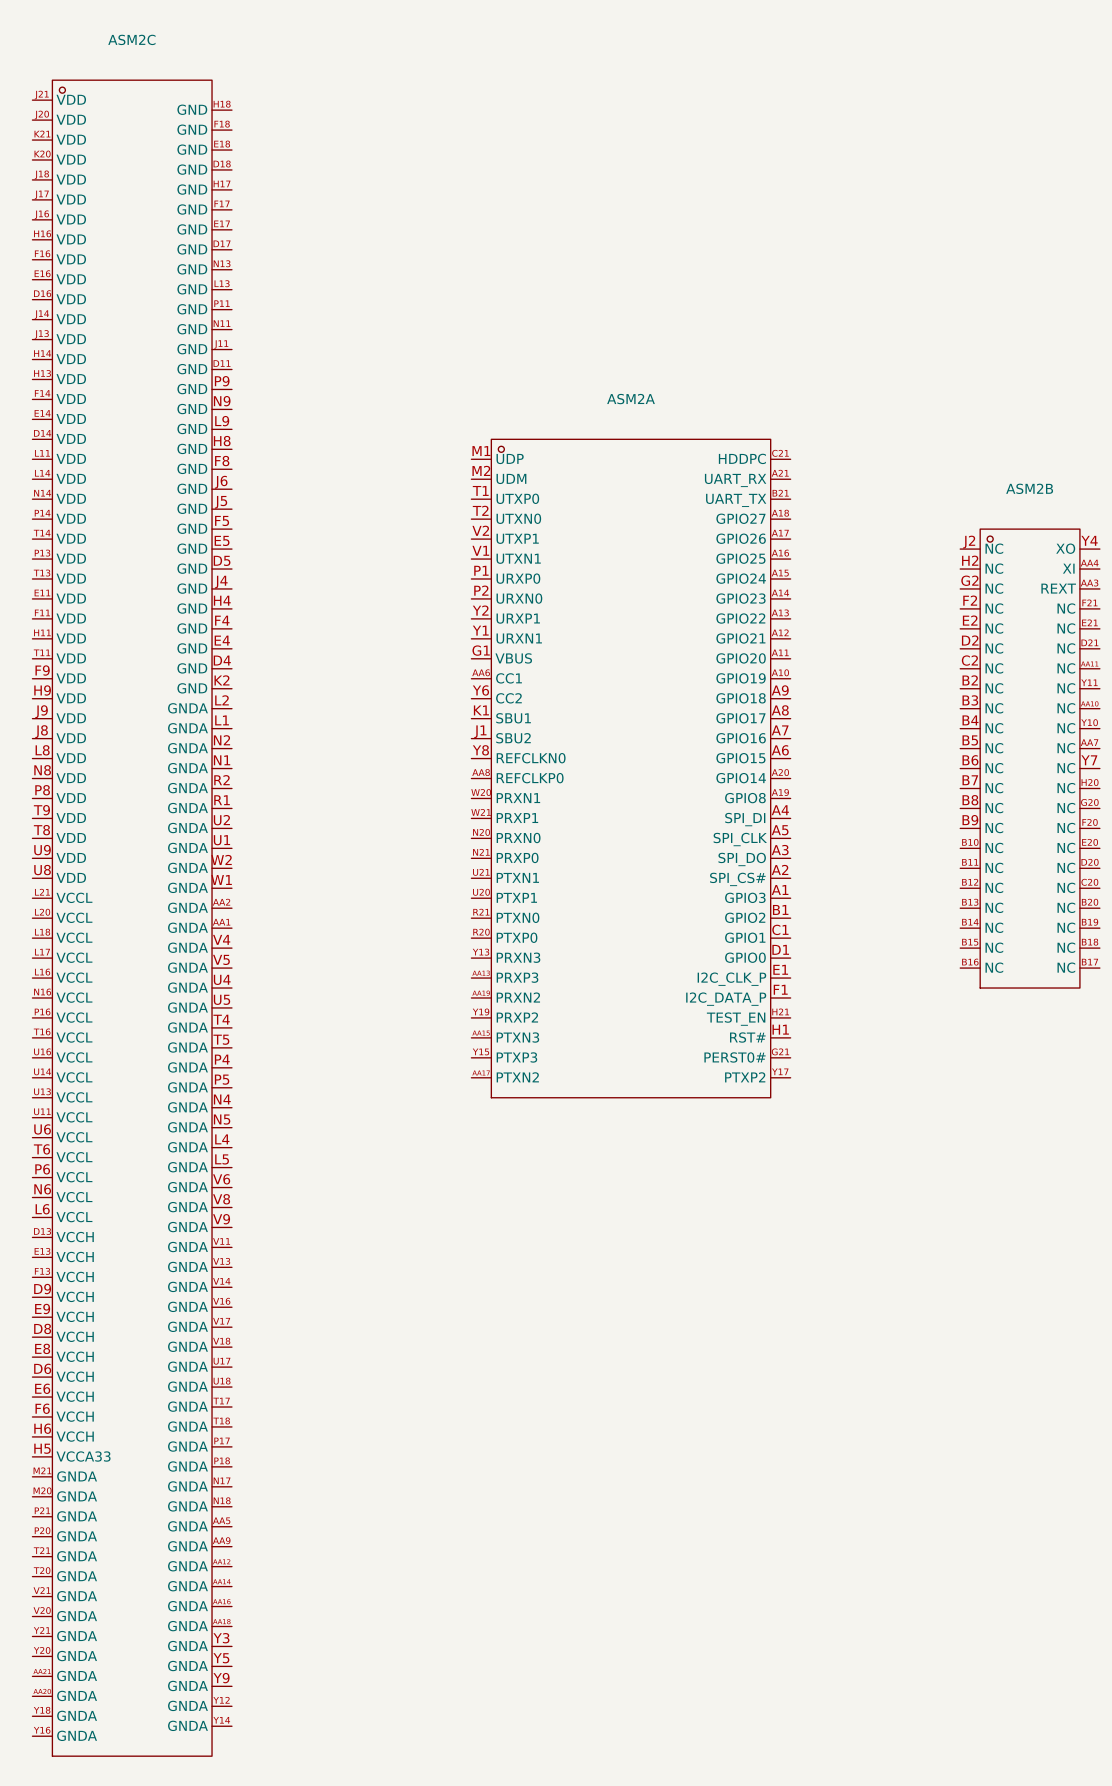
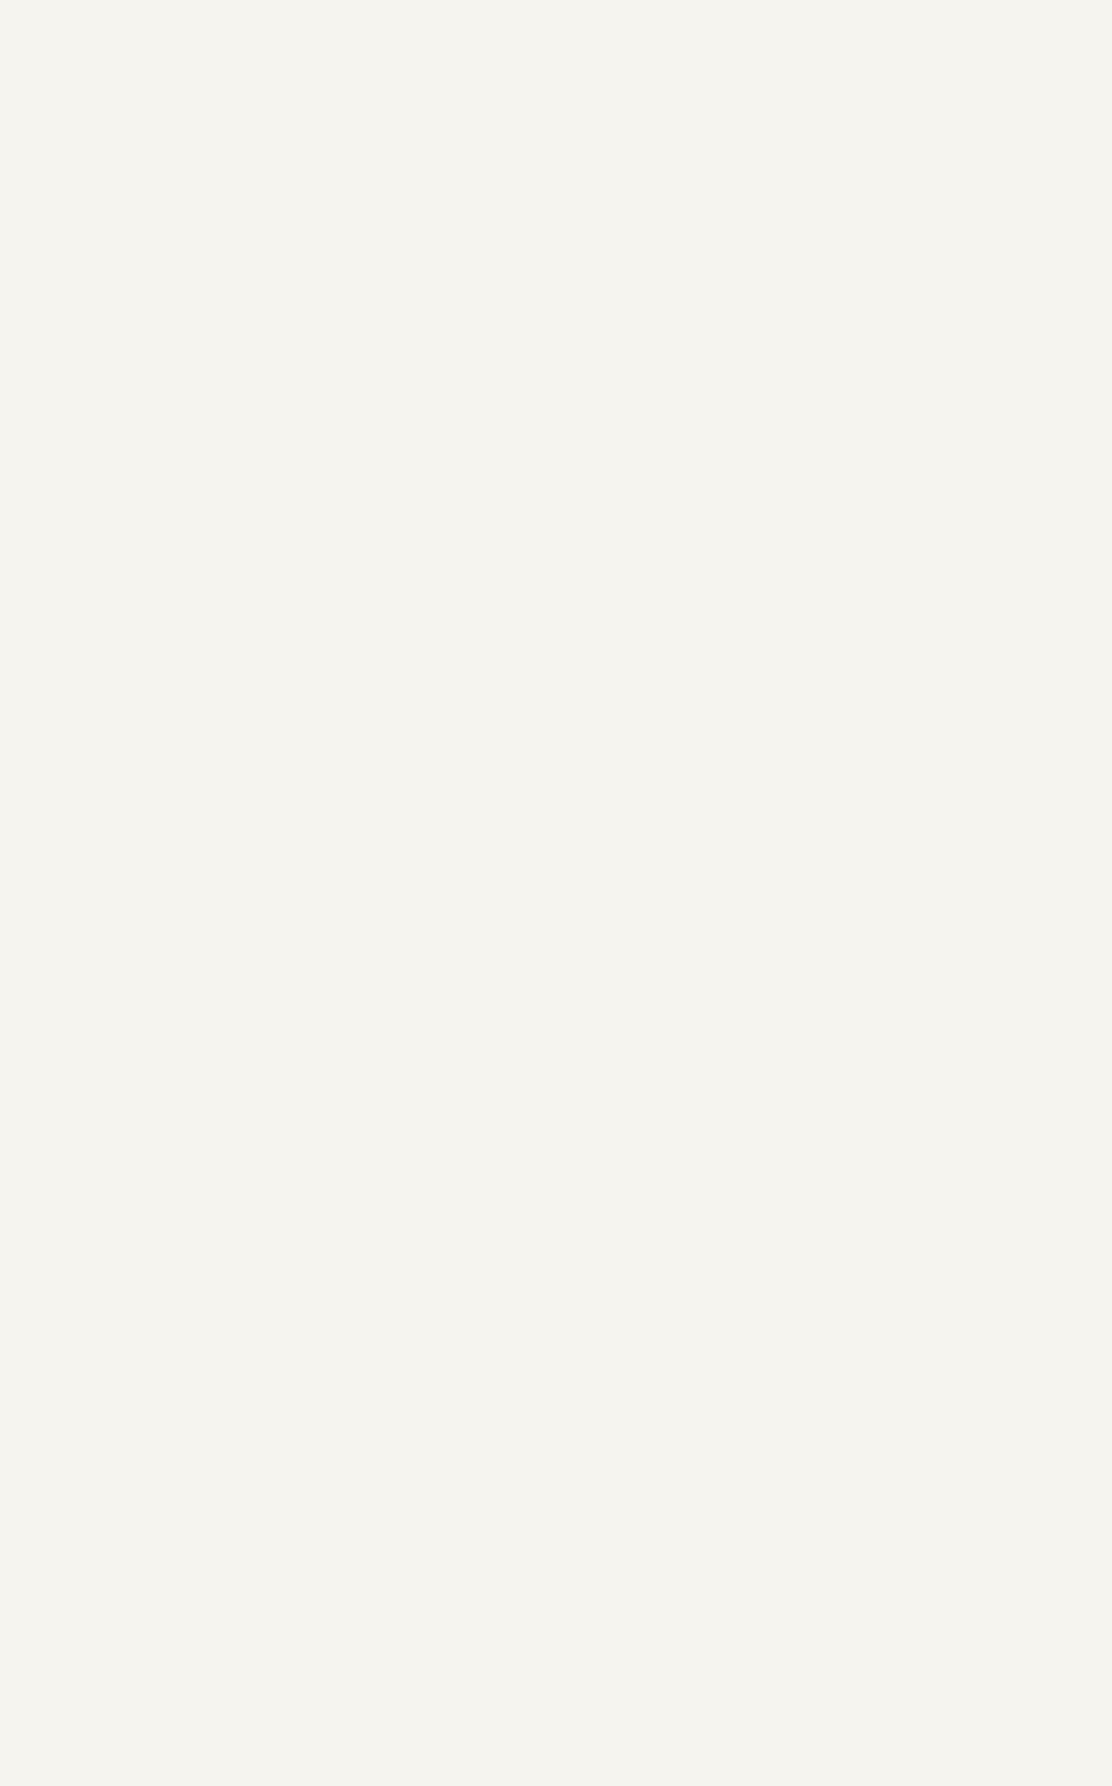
ASM2B: (1030, 758) -> none
ASM2A: (631, 768) -> none
ASM2C: (132, 918) -> none

